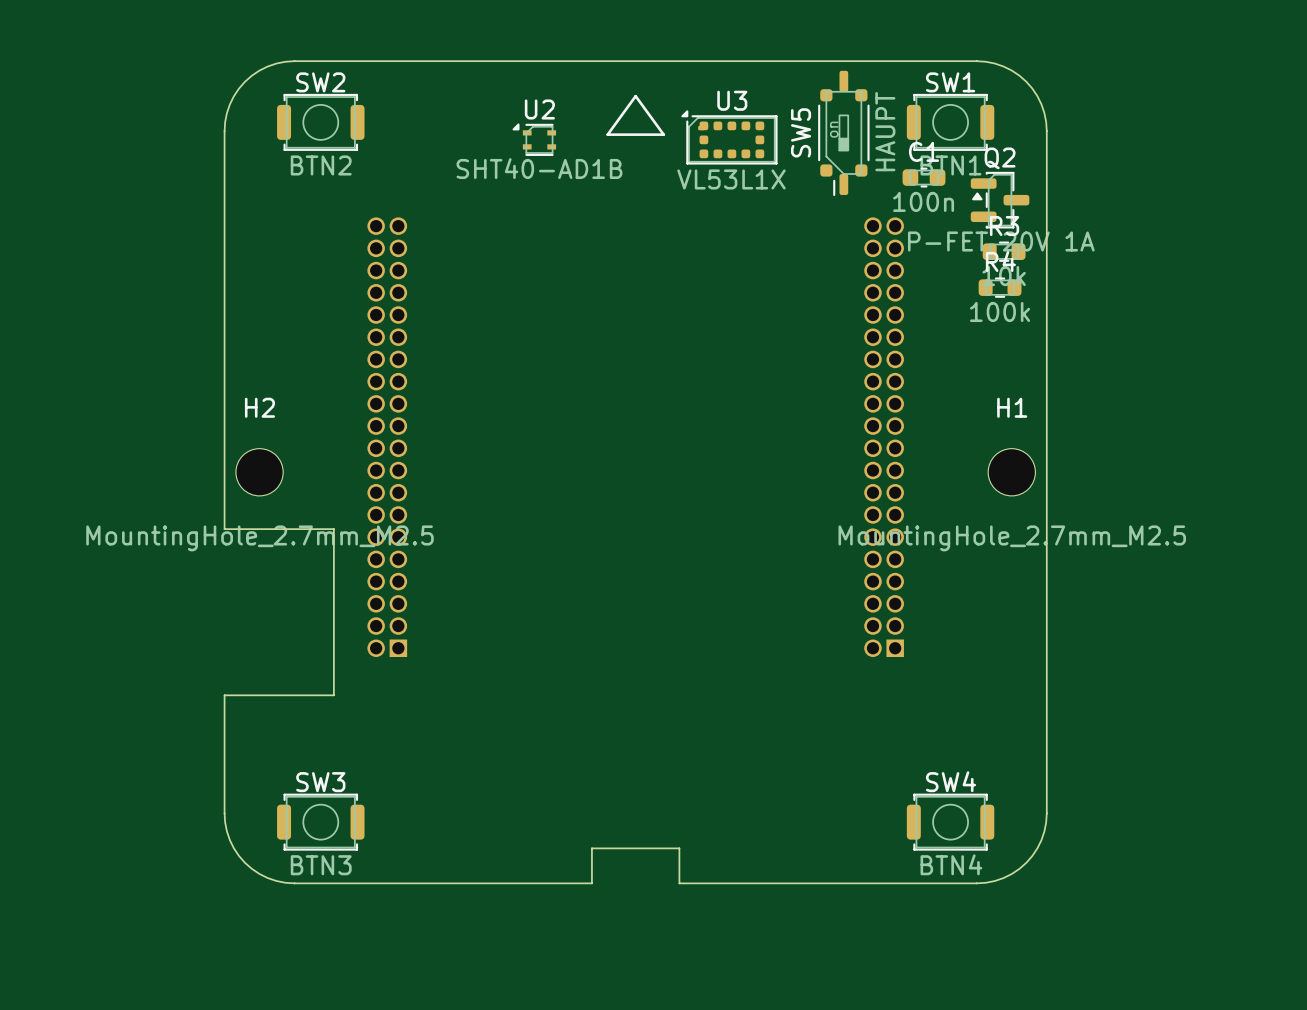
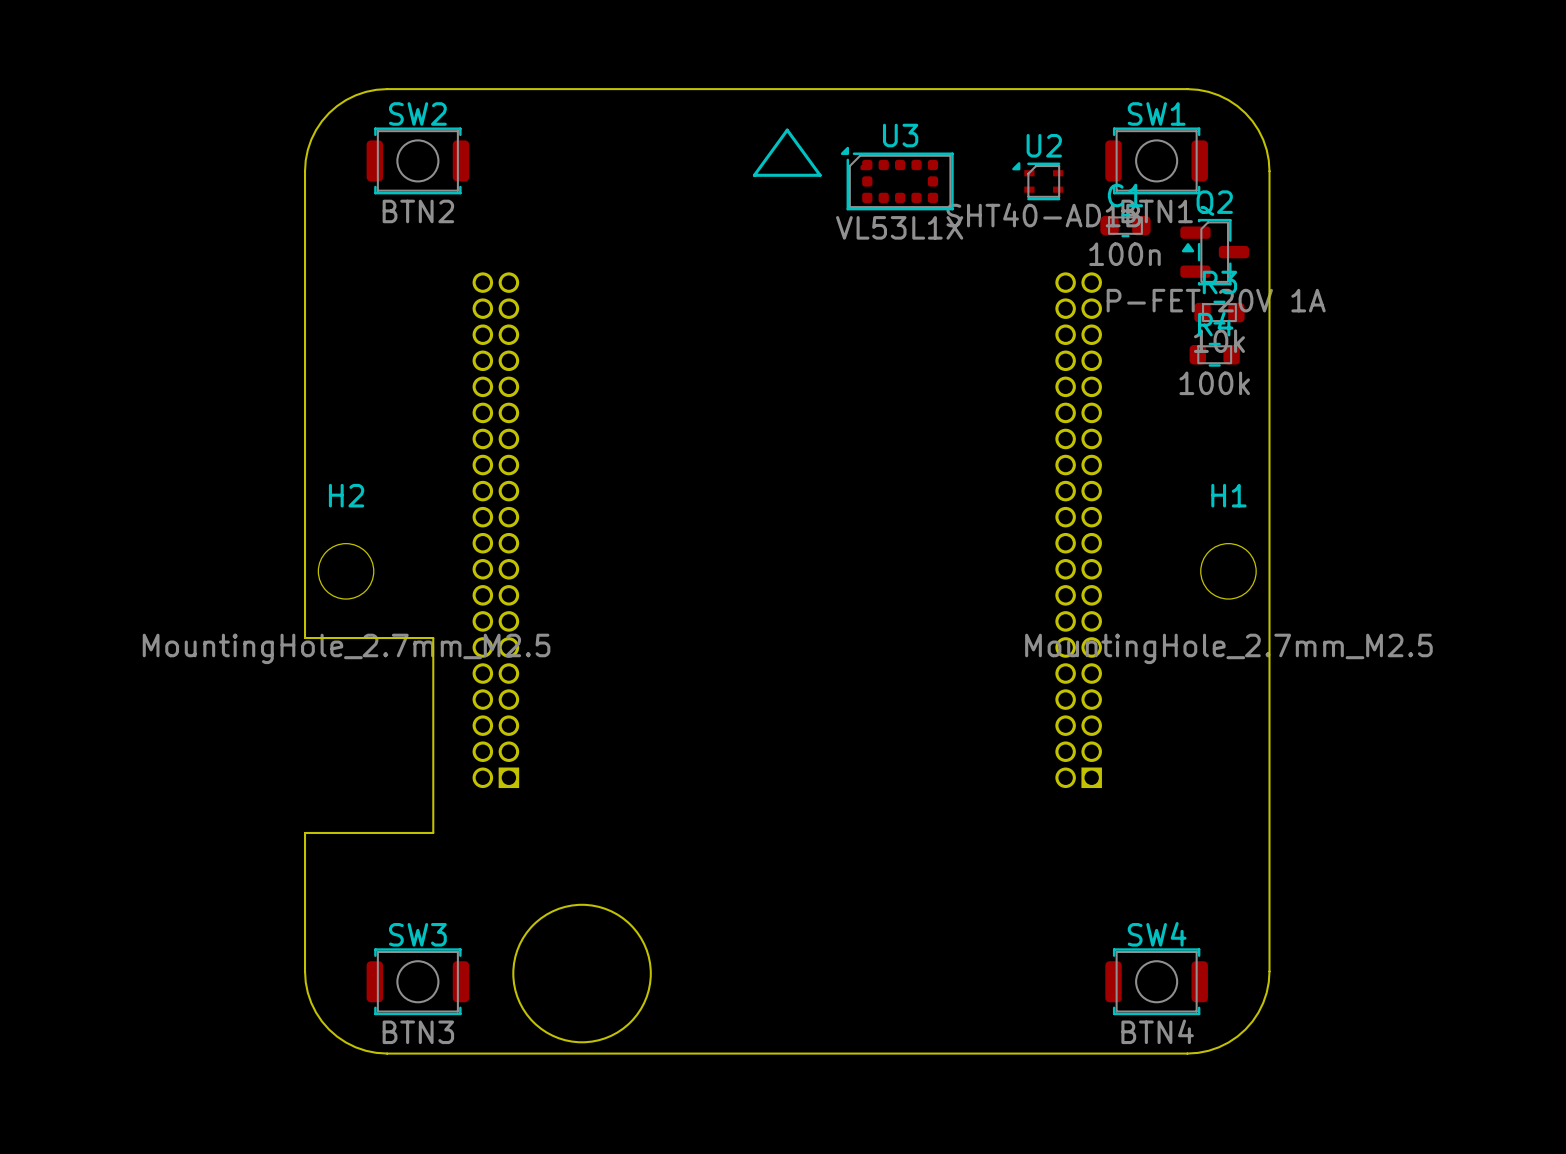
SW5: HAUPT (843, 133) -> none
U2 position: (534, 139) -> (1037, 181)
round board edge: none -> [512, 903, 652, 1044]
board edge: (591, 883) (591, 848) (679, 848) (679, 883) -> (735, 1053) (838, 1053)

